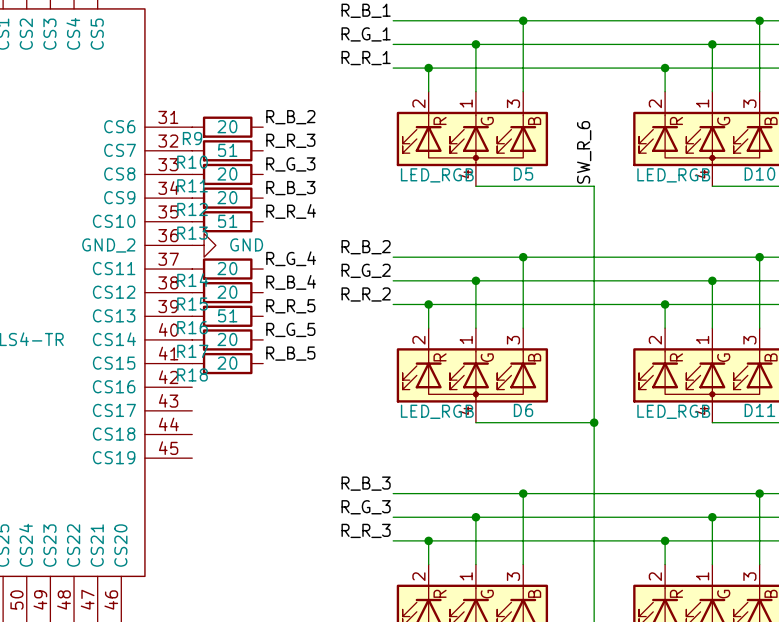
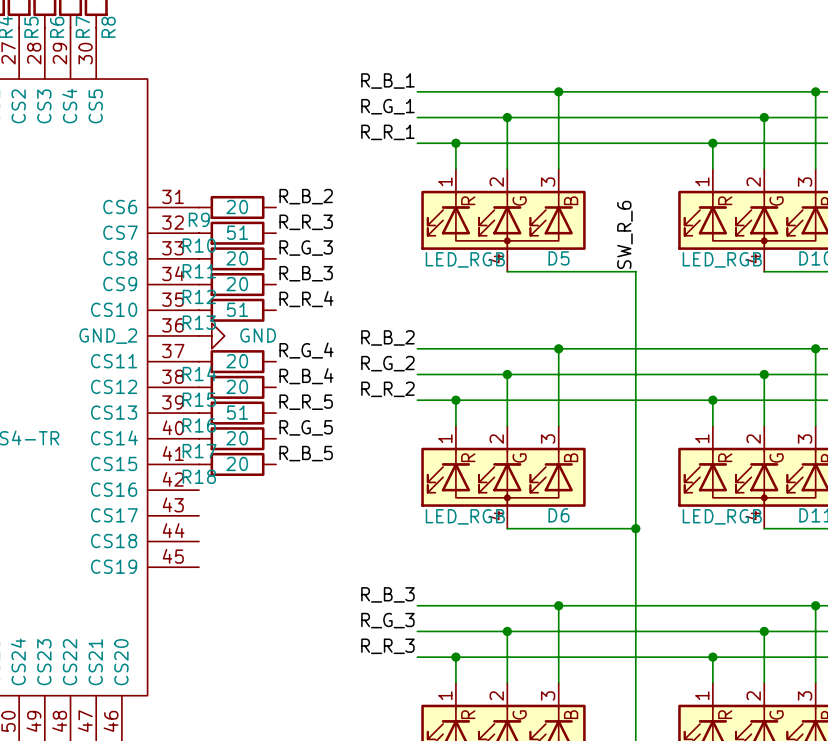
D5 pin number: 2 (418, 103) -> 1 (445, 181)
D5 pin number: 1 (466, 103) -> 2 (496, 182)
D10 pin number: 2 (655, 103) -> 1 (702, 181)
D10 pin number: 1 (702, 103) -> 2 (753, 182)
D6 pin number: 1 (466, 339) -> 2 (496, 439)
D11 pin number: 1 (702, 339) -> 2 (753, 439)
D6 pin number: 2 (418, 340) -> 1 (445, 438)
D11 pin number: 2 (655, 340) -> 1 (702, 438)
part pin number: 2 (418, 576) -> 1 (445, 695)
part pin number: 1 (466, 576) -> 2 (496, 695)
part pin number: 2 (655, 576) -> 1 (702, 695)
part pin number: 1 (702, 576) -> 2 (753, 695)

